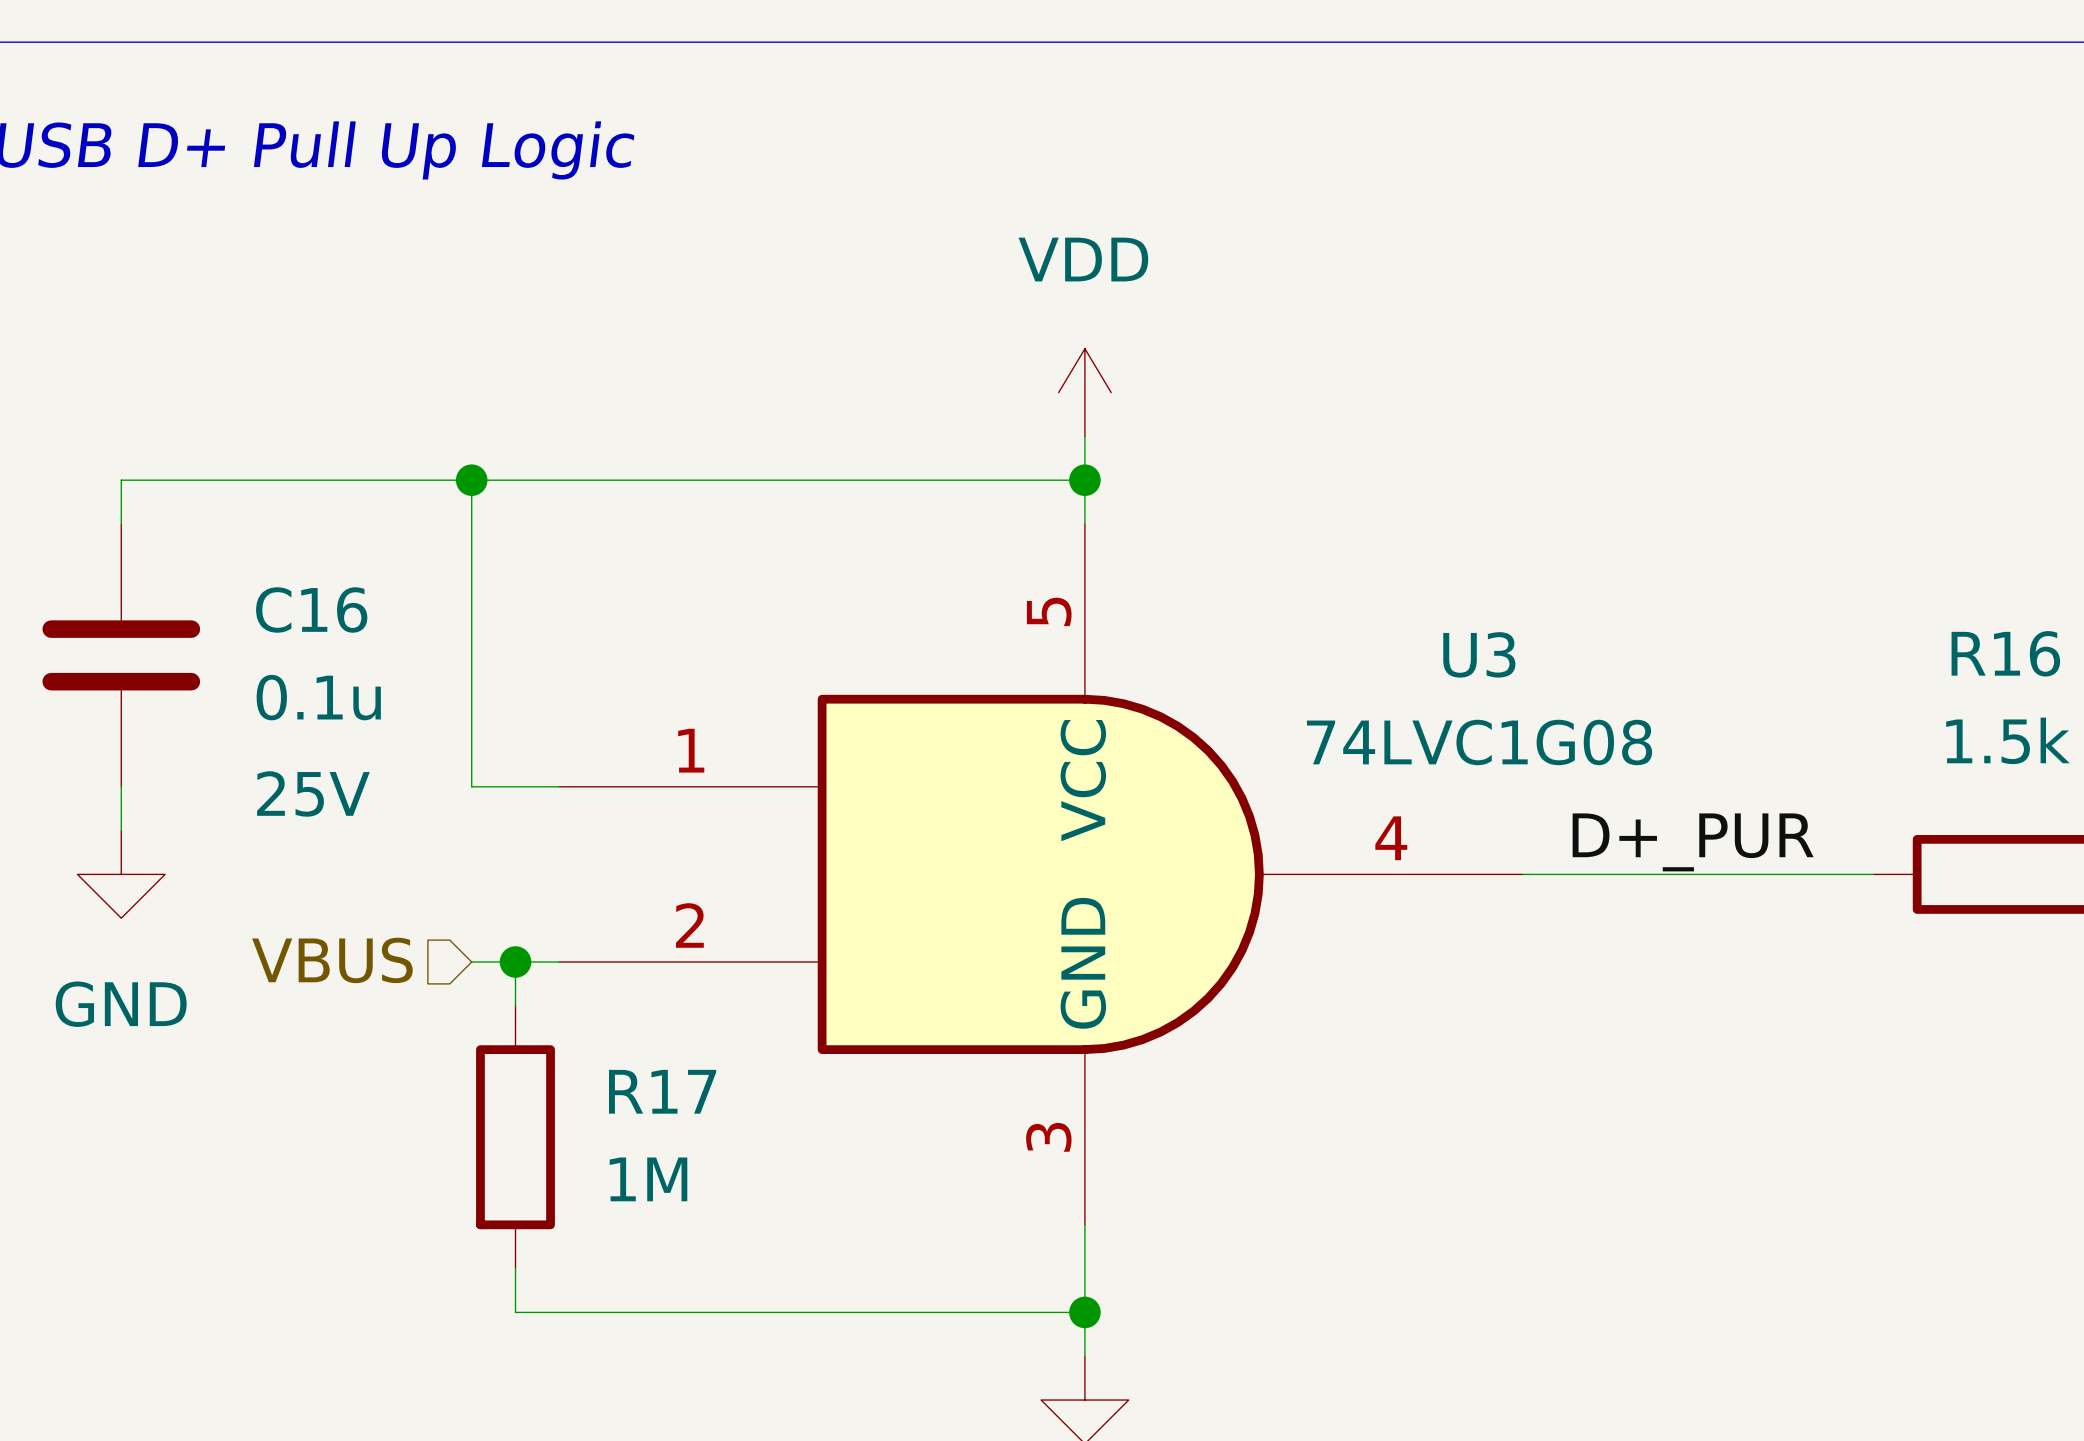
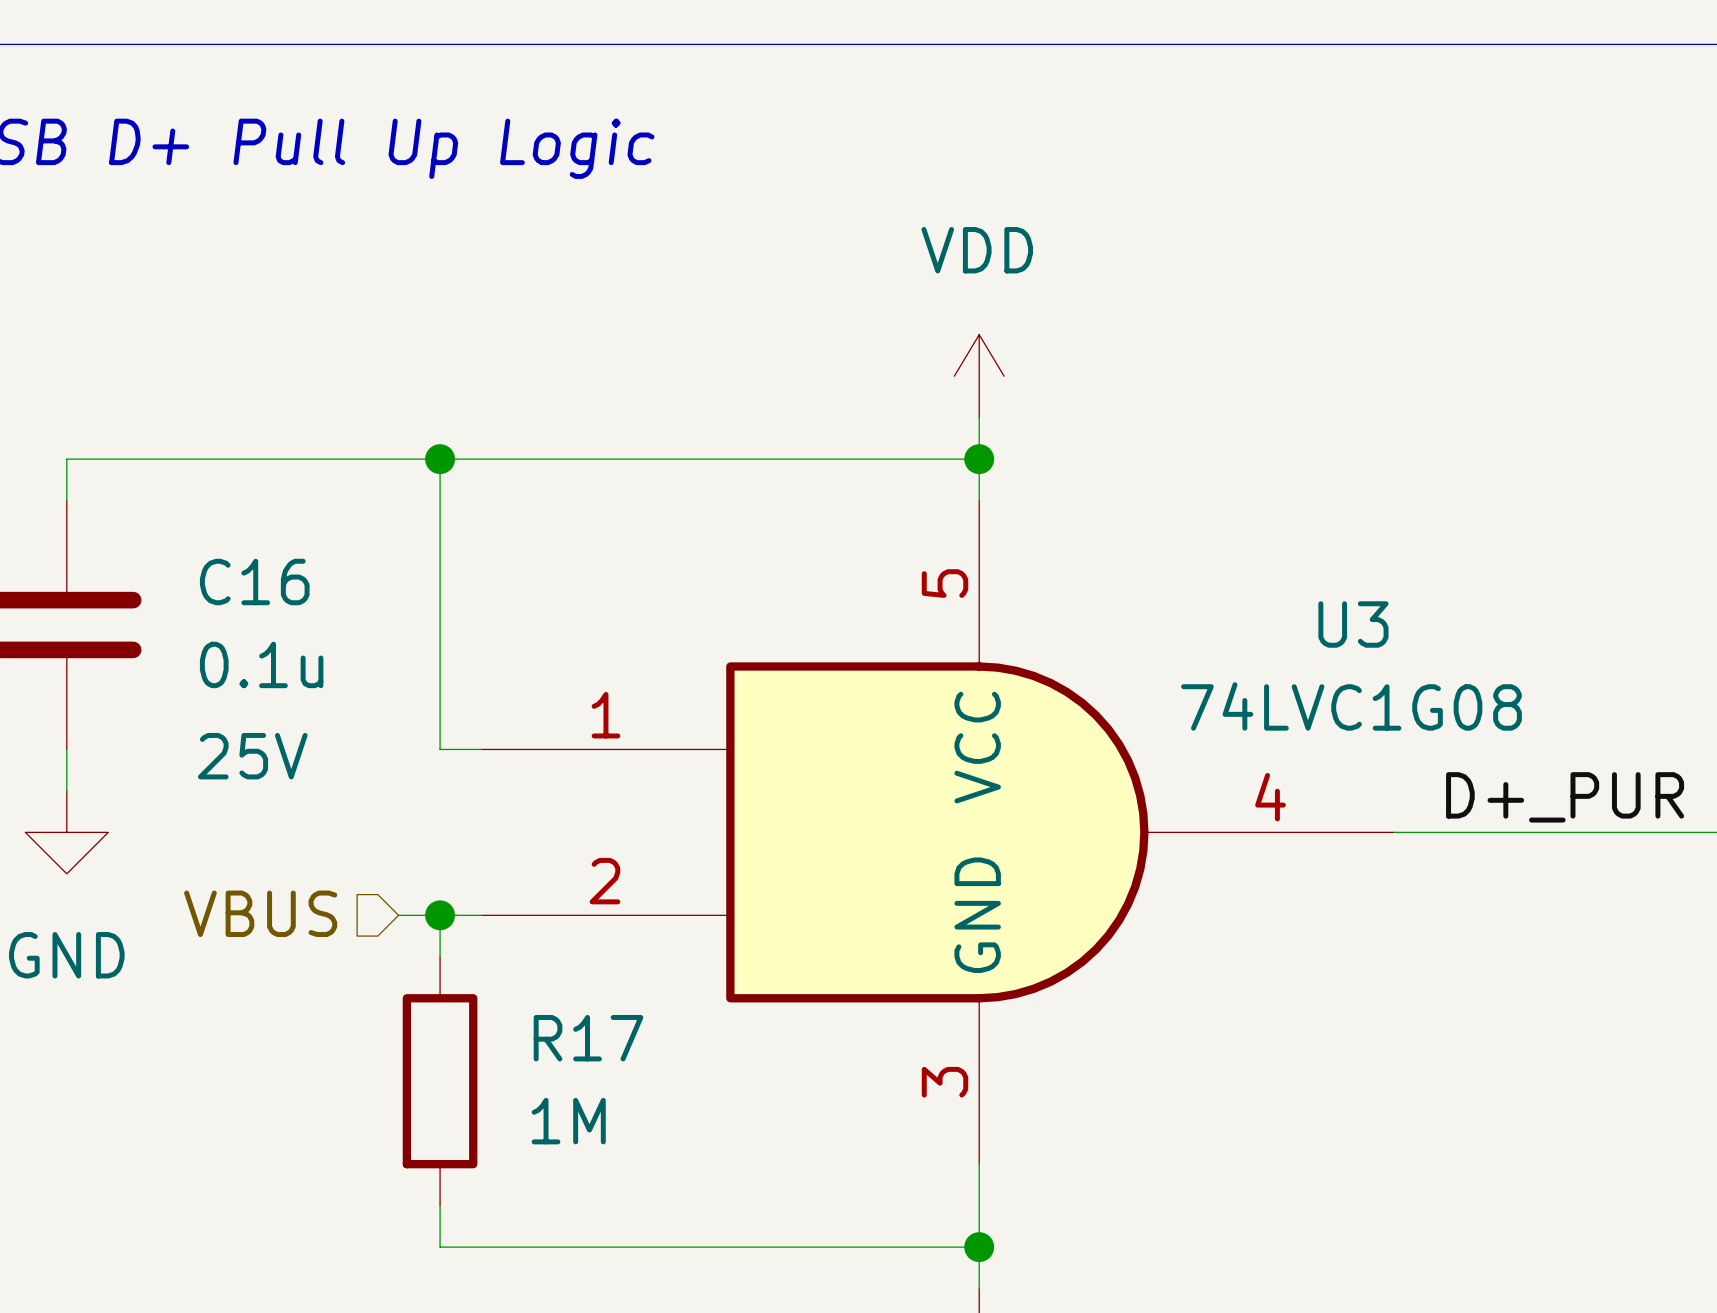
wire: (471, 480) (471, 786) (515, 786) -> (440, 459) (440, 749)
junction position: (471, 480) -> (440, 459)

